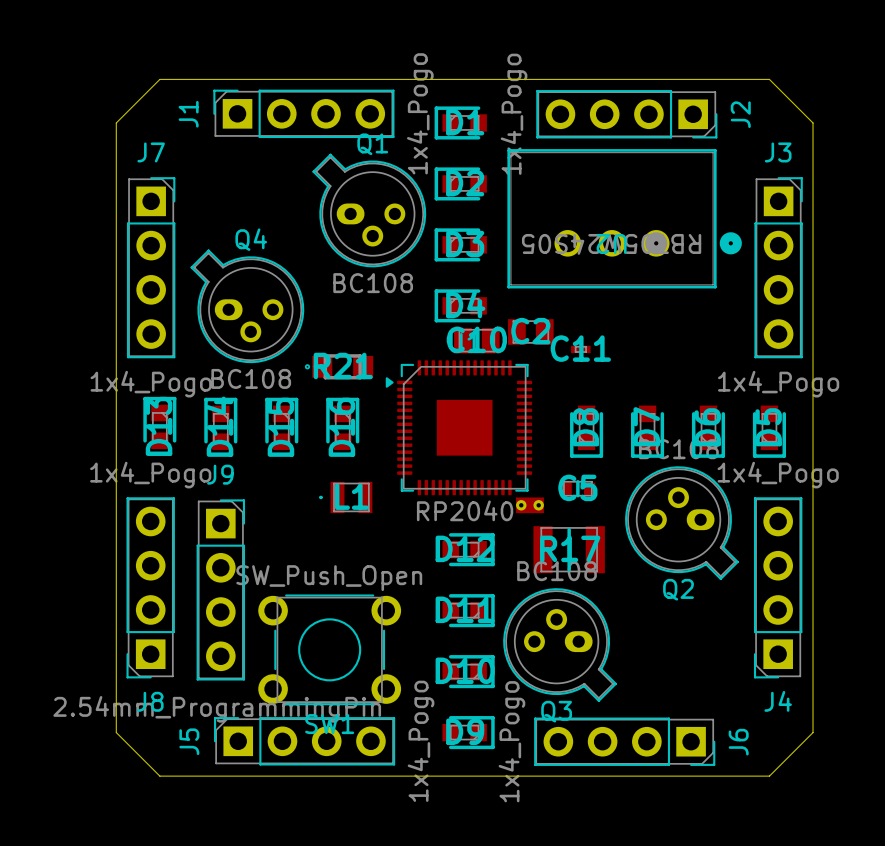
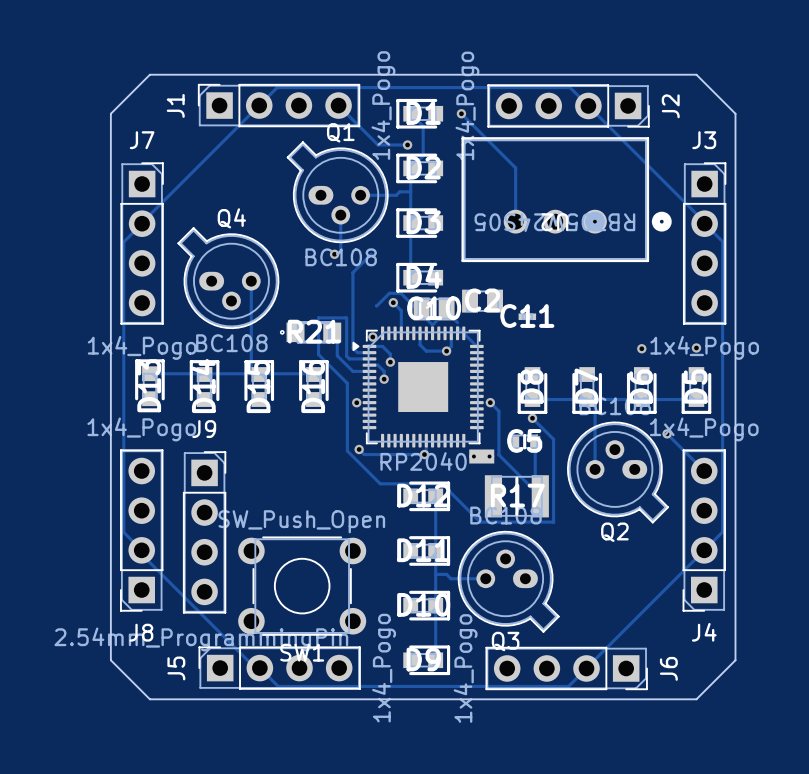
track: none -> (277, 87) (123, 242) (123, 532) (141, 550) (141, 554) (255, 668) (259, 668) (278, 686) (568, 686) (722, 531) (722, 241) (570, 87) (277, 87)
track: none -> (338, 105) (377, 144) (407, 144)
track: none -> (410, 113) (423, 126) (423, 155) (410, 168) (410, 277)
track: none -> (461, 113) (515, 167) (515, 221)
via: none -> (461, 113)
via: none -> (407, 144)
track: none -> (410, 191) (399, 191) (396, 195) (360, 195)
track: none -> (340, 215) (340, 250) (334, 254)
via: none -> (334, 254)
track: none -> (371, 254) (352, 272) (352, 347) (357, 352) (369, 352)
track: none -> (251, 281) (251, 373)
track: none -> (393, 302) (401, 310) (401, 333)
via: none -> (393, 302)
track: none -> (376, 305) (389, 293) (400, 293) (432, 324) (443, 313) (443, 308) (457, 322)
track: none -> (457, 327) (476, 346)
track: none -> (332, 332) (337, 337) (337, 355) (352, 371) (369, 371)
track: none -> (420, 333) (420, 344) (426, 351) (446, 351) (451, 346) (451, 333)
via: none -> (372, 337)
track: none -> (368, 345) (382, 346) (390, 354) (390, 362)
via: none -> (696, 347)
via: none -> (641, 348)
via: none -> (446, 351)
track: none -> (369, 358) (349, 358) (346, 356) (346, 317) (318, 317) (318, 354) (347, 383) (347, 450) (380, 483) (447, 483) (447, 489) (480, 522) (553, 522) (553, 439) (532, 418)
via: none -> (390, 362)
track: none -> (369, 365) (377, 365) (384, 371) (384, 379)
track: none -> (149, 373) (313, 374)
via: none -> (384, 379)
track: none -> (532, 399) (696, 399)
track: none -> (595, 399) (595, 469)
via: none -> (356, 402)
track: none -> (490, 402) (498, 411) (498, 454) (540, 496)
via: none -> (490, 402)
via: none -> (532, 418)
track: none -> (665, 433) (704, 471)
via: none -> (667, 433)
track: none -> (426, 440) (426, 452) (424, 454) (364, 454) (359, 449)
track: none -> (535, 441) (535, 491)
L1: (345, 497) -> none
via: none -> (359, 449)
via: none -> (424, 454)
track: none -> (435, 496) (435, 660)
track: none -> (435, 574) (446, 574) (450, 578) (485, 578)

